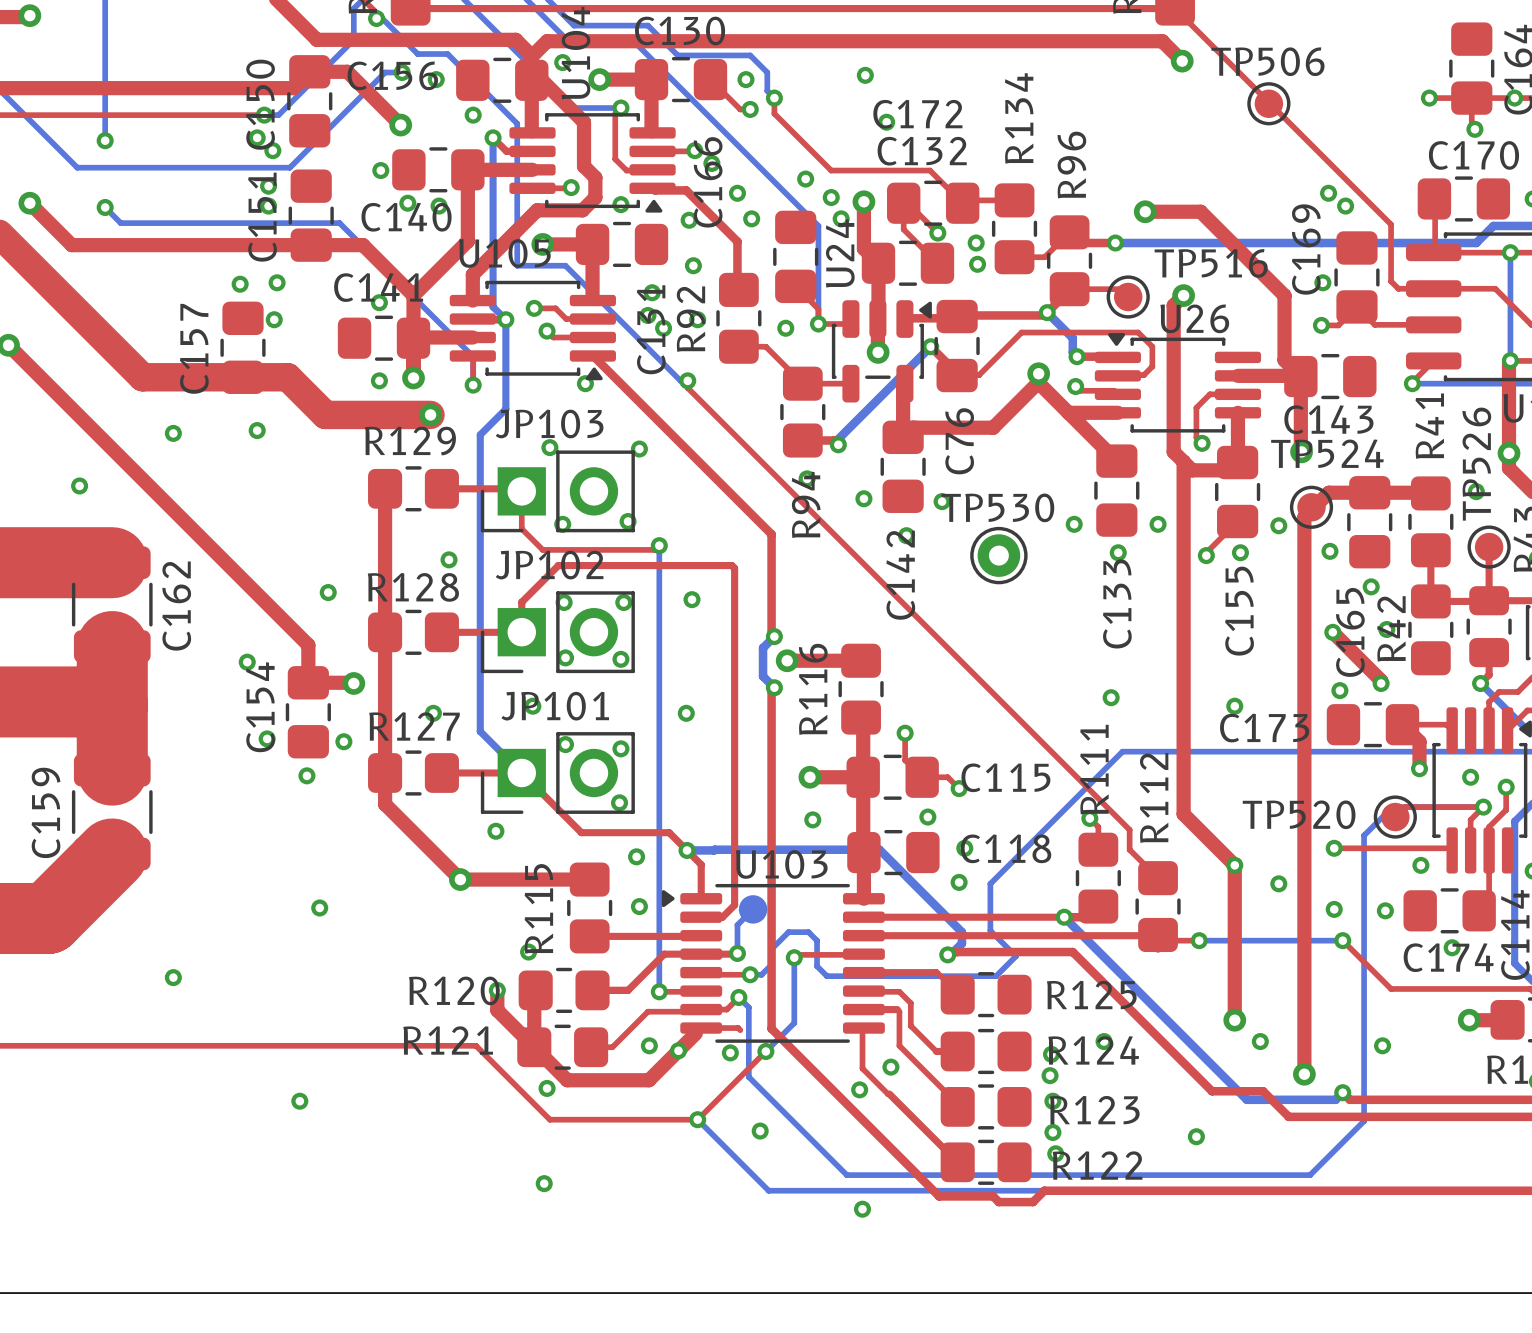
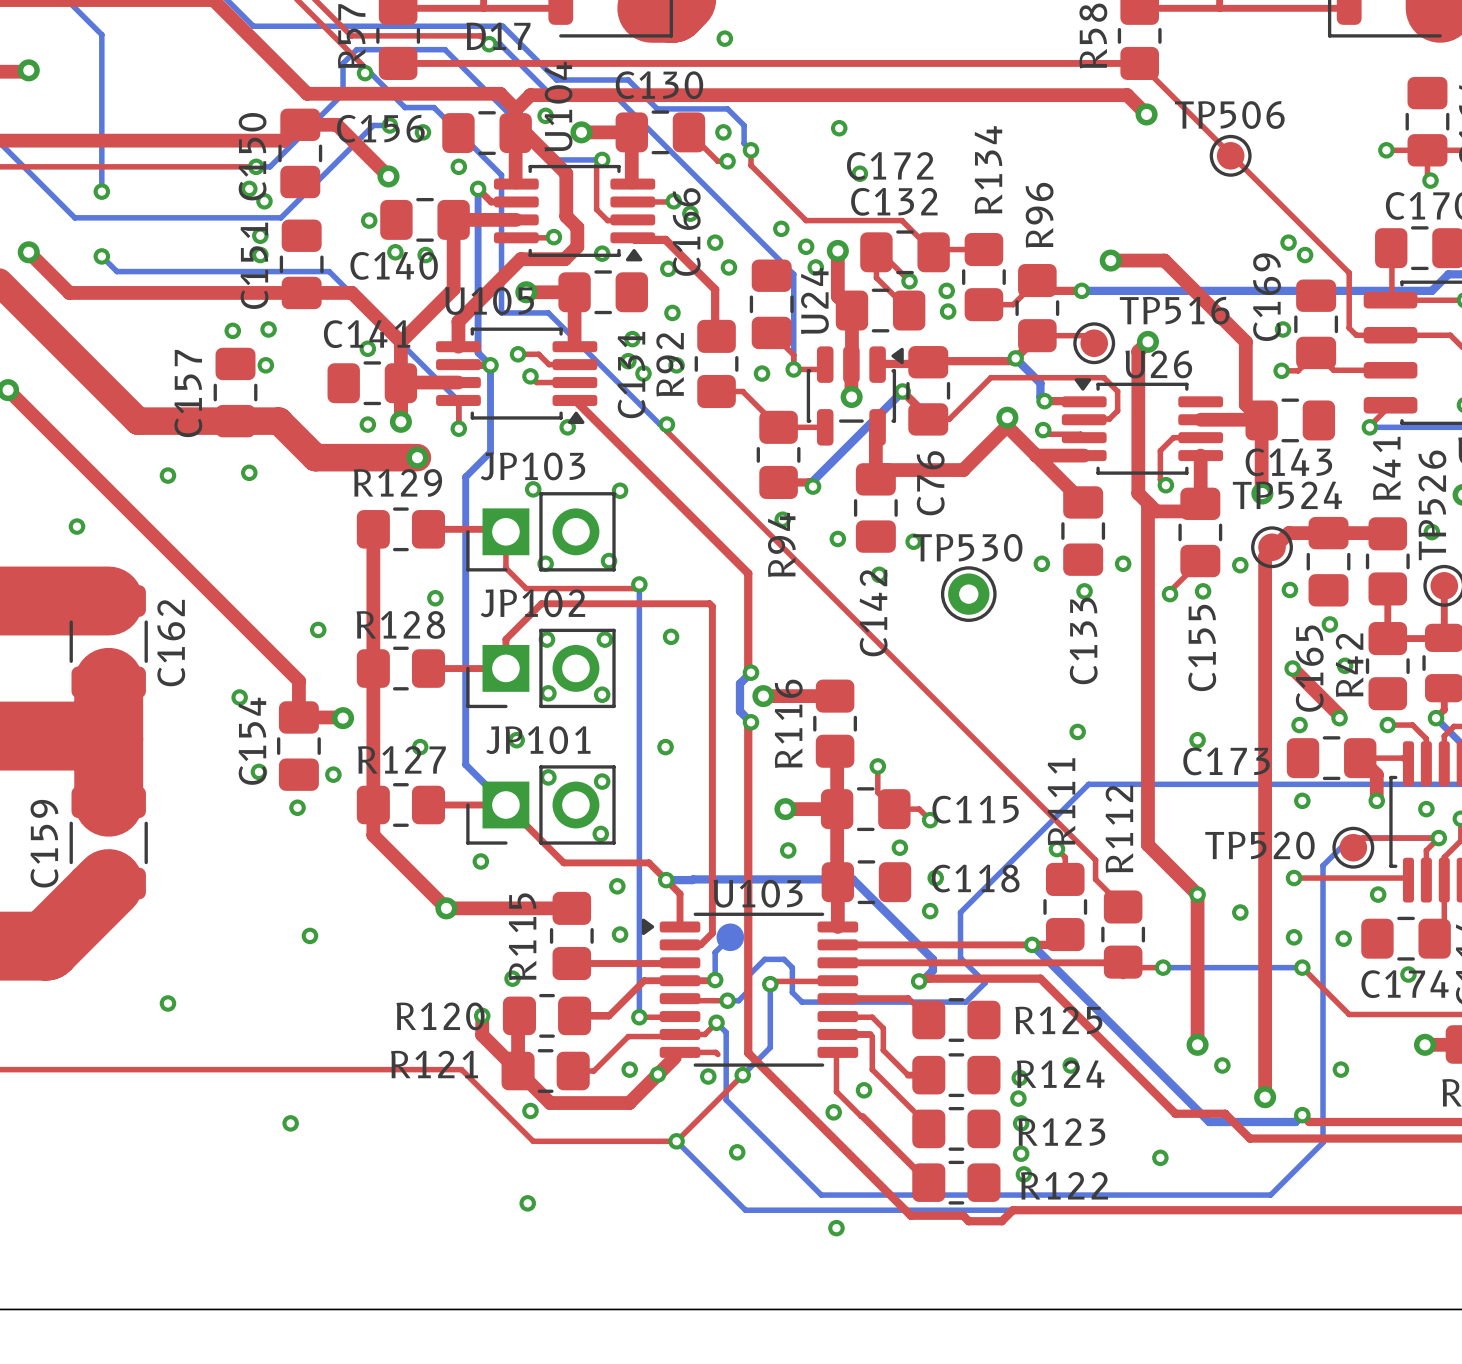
top track: none -> (1387, 725) (1412, 725) (1426, 738) (1426, 763)
via: none -> (1387, 725)
via: none -> (1302, 800)

